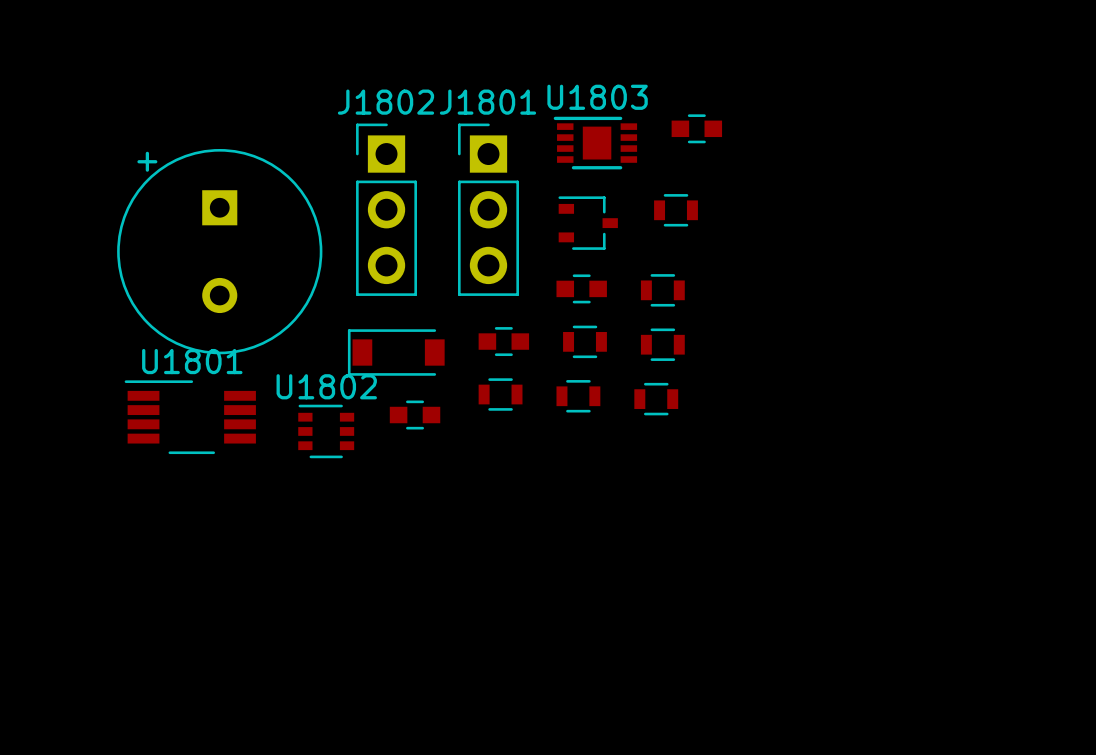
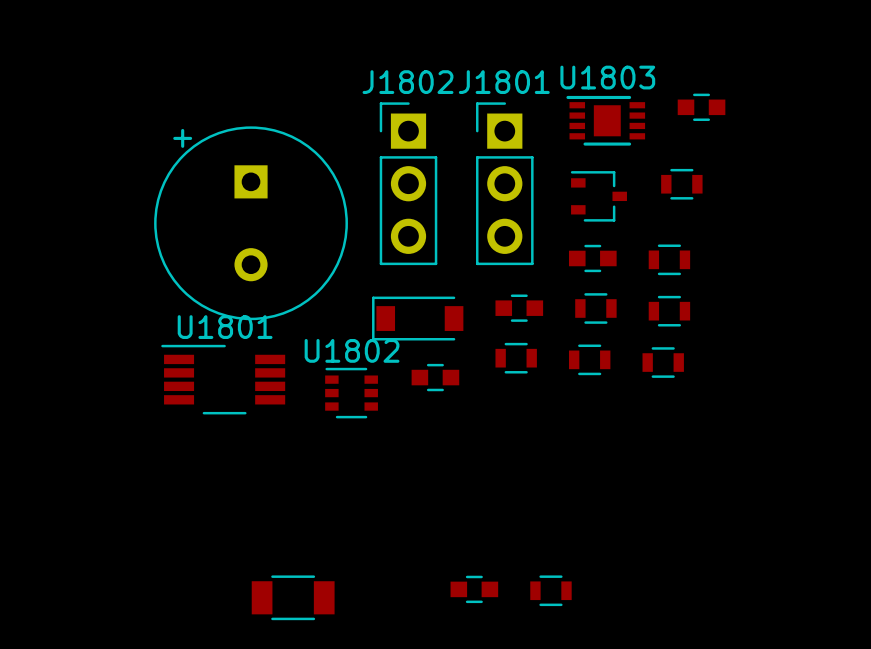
part: none -> (474, 589)
part: none -> (550, 590)
part: none -> (293, 597)

